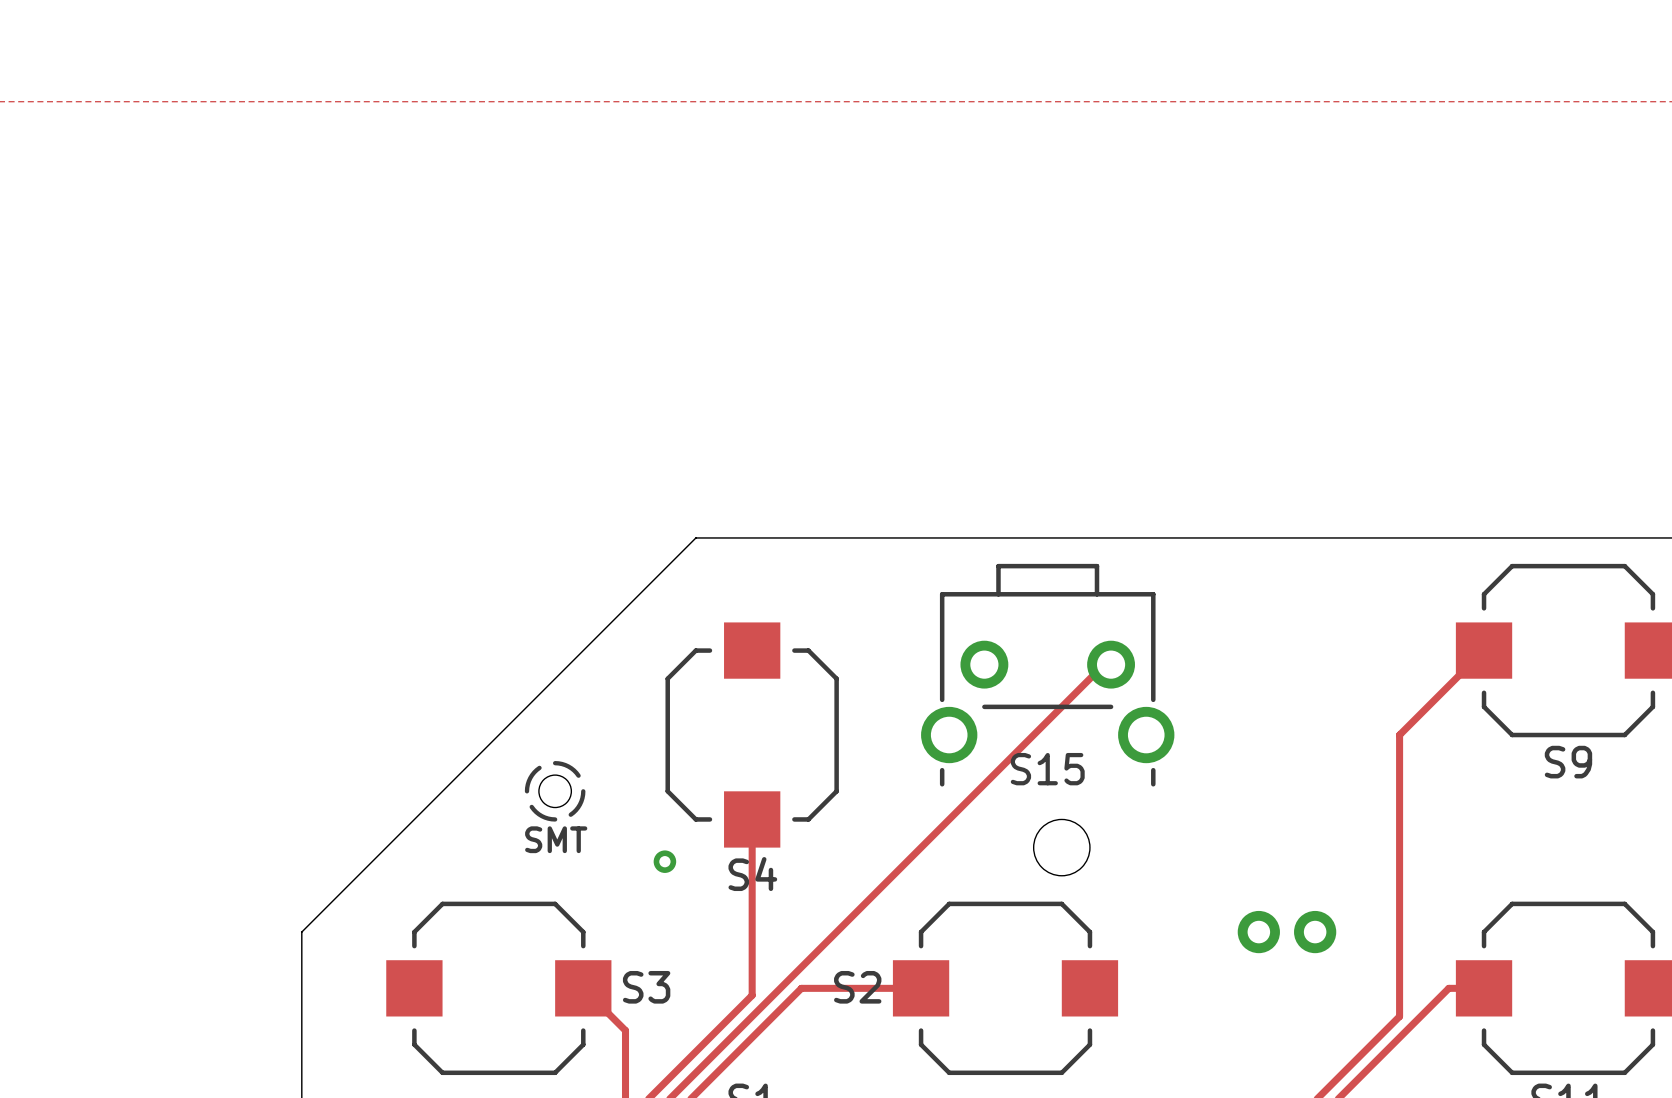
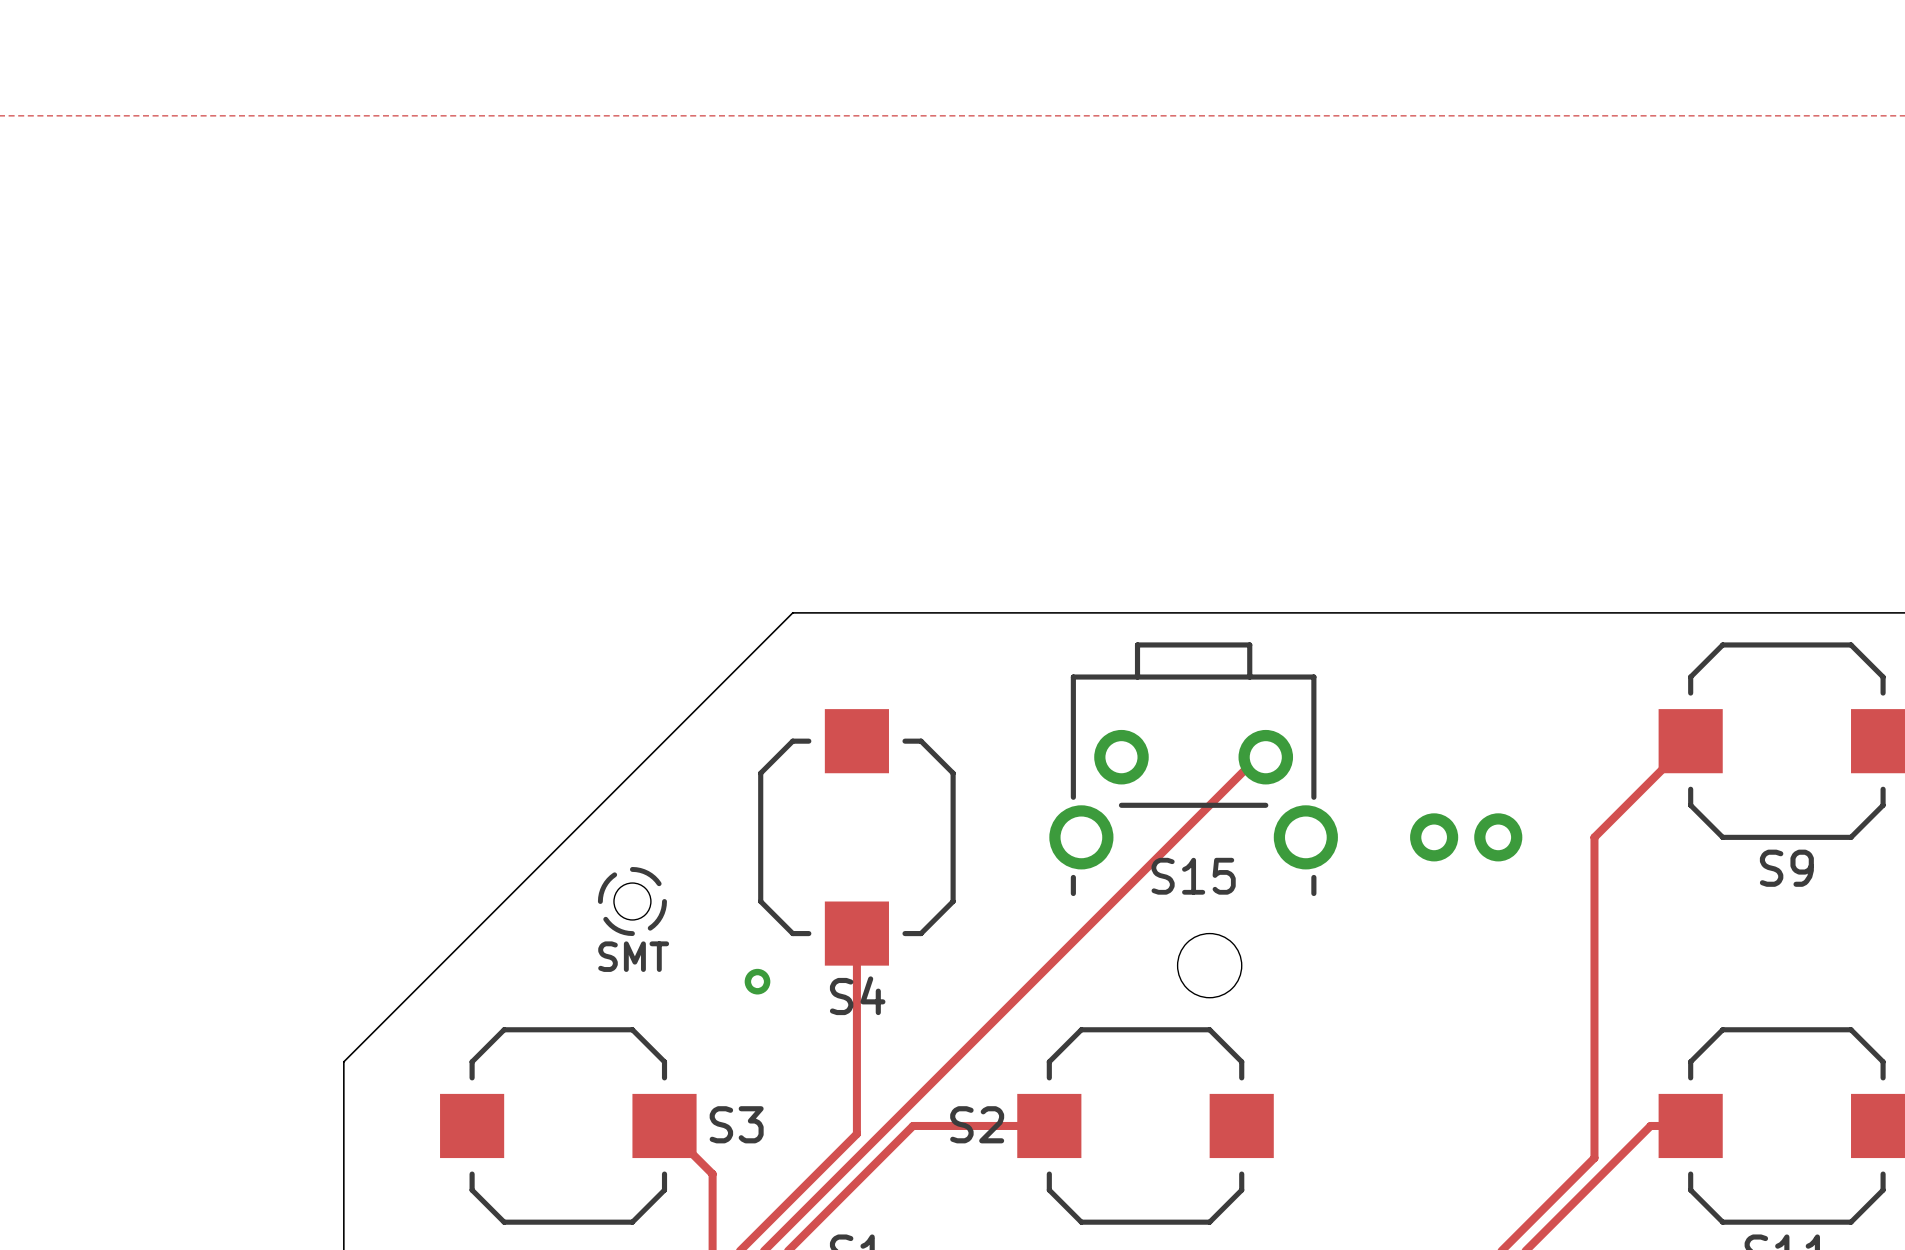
part position: (1286, 932) -> (1466, 837)

